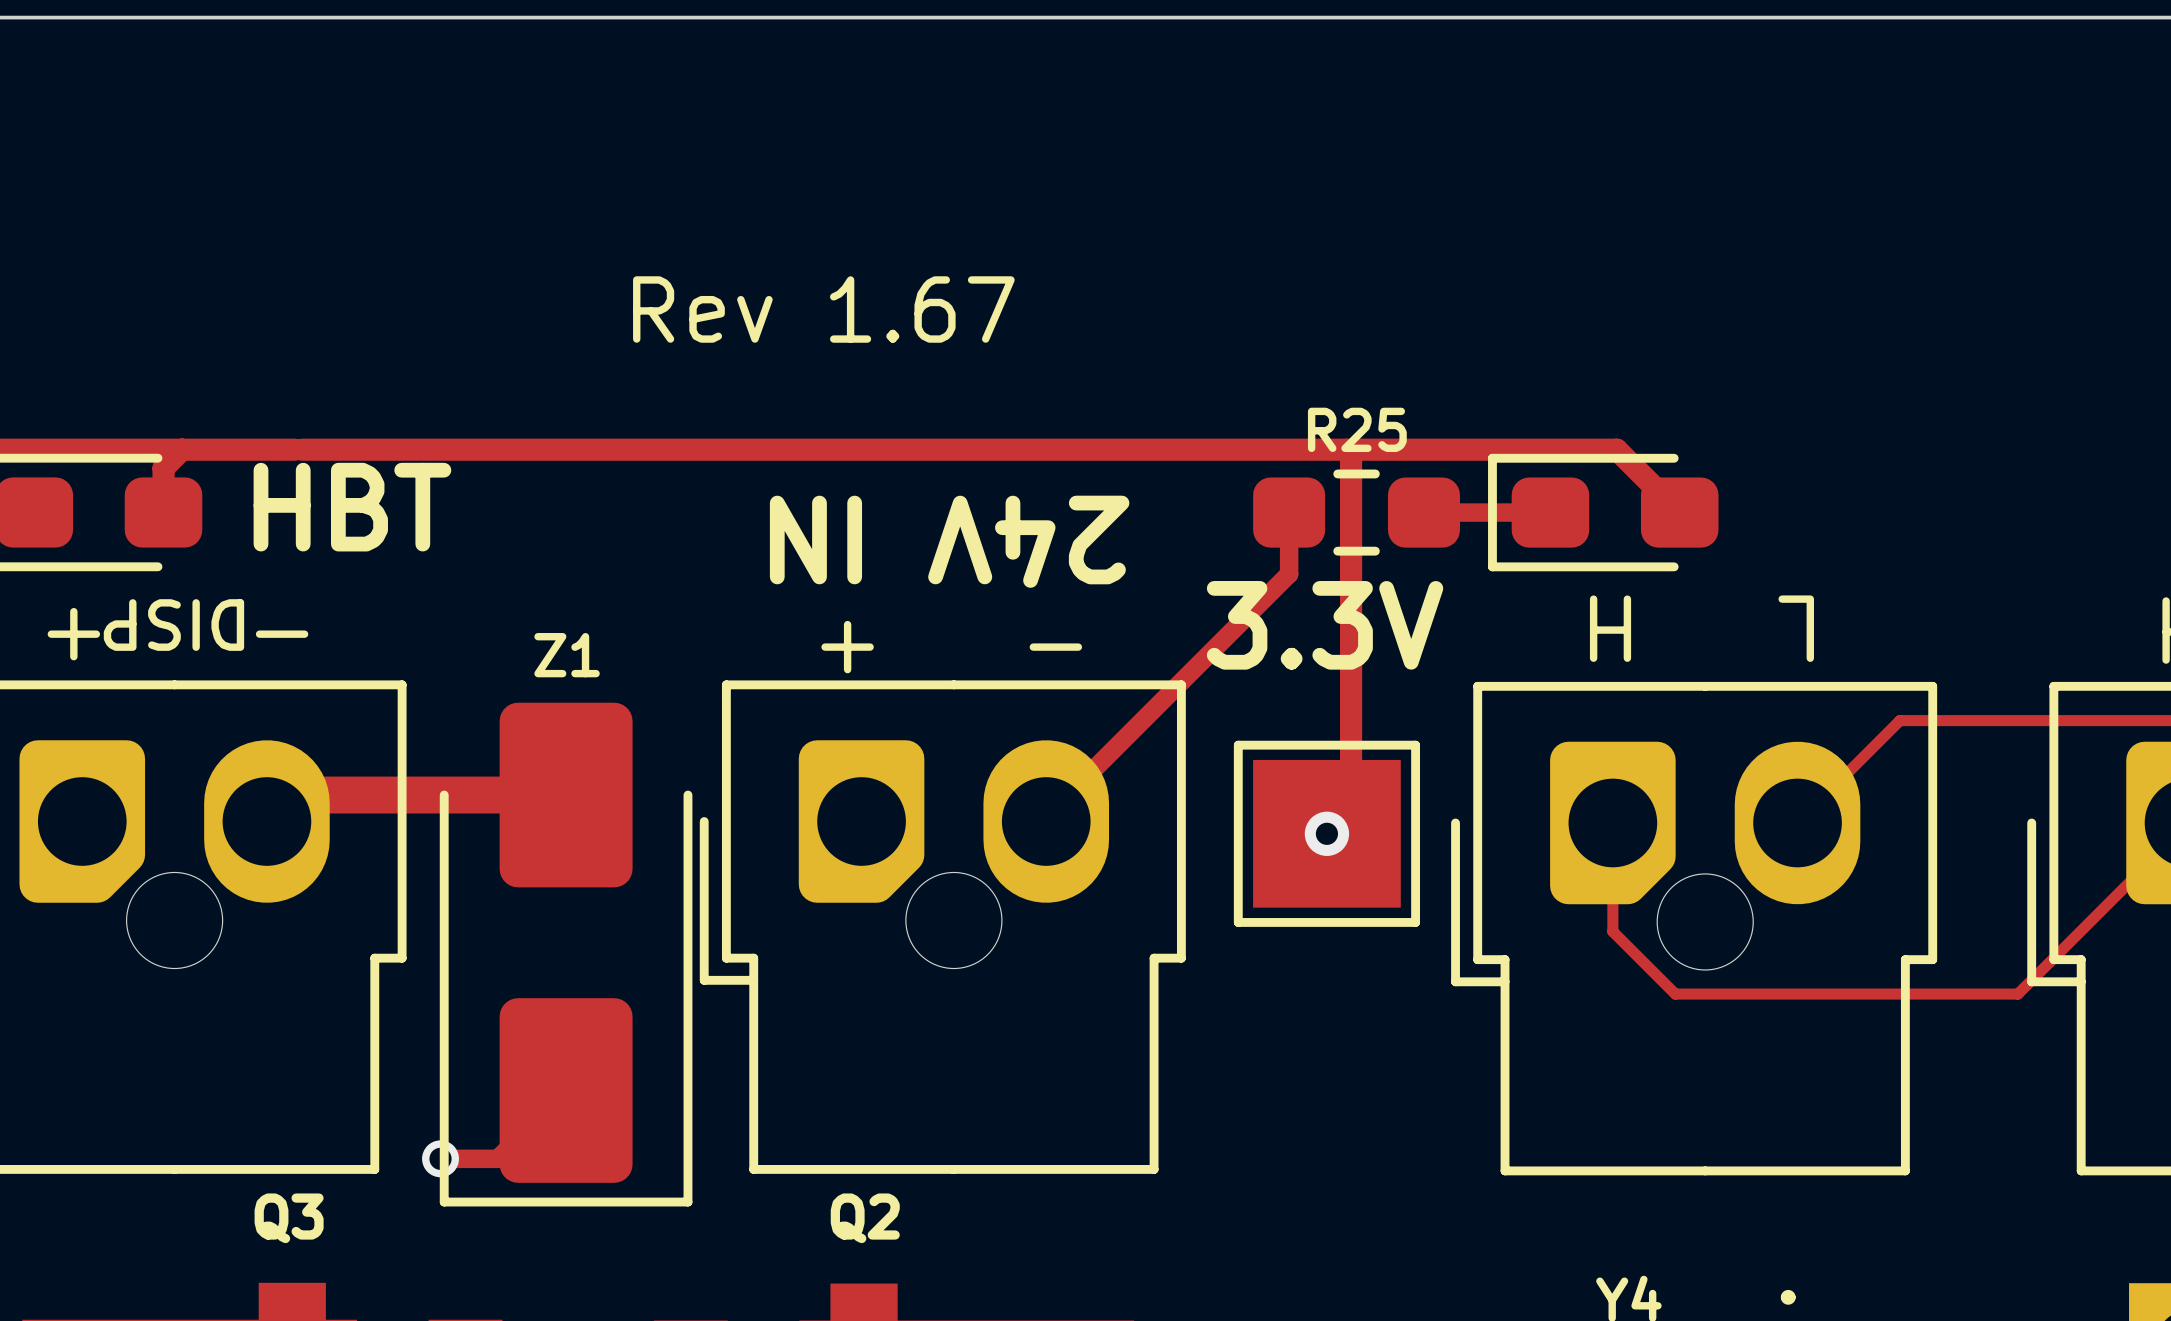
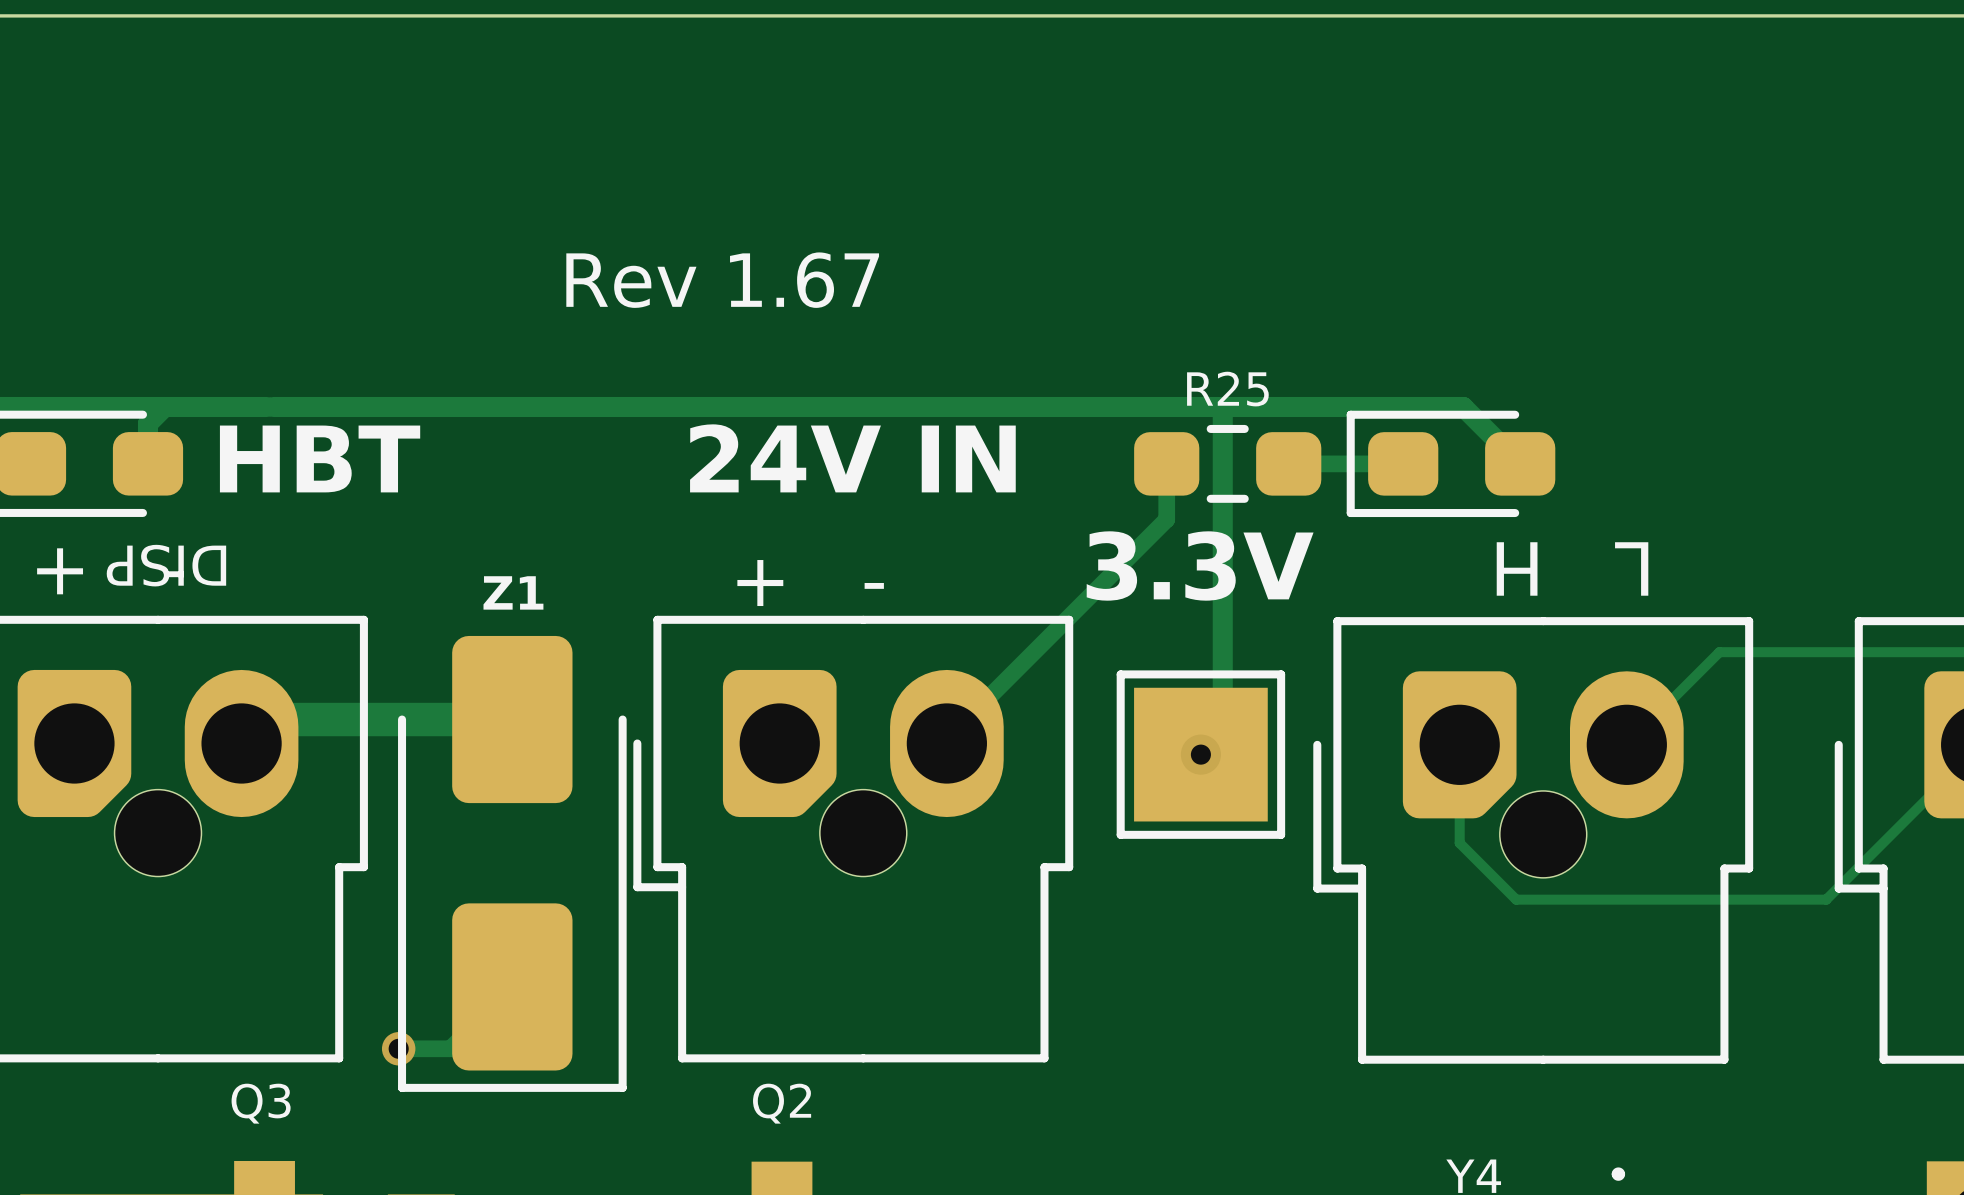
text rotation: 0° (949, 541) -> 180° (852, 458)

